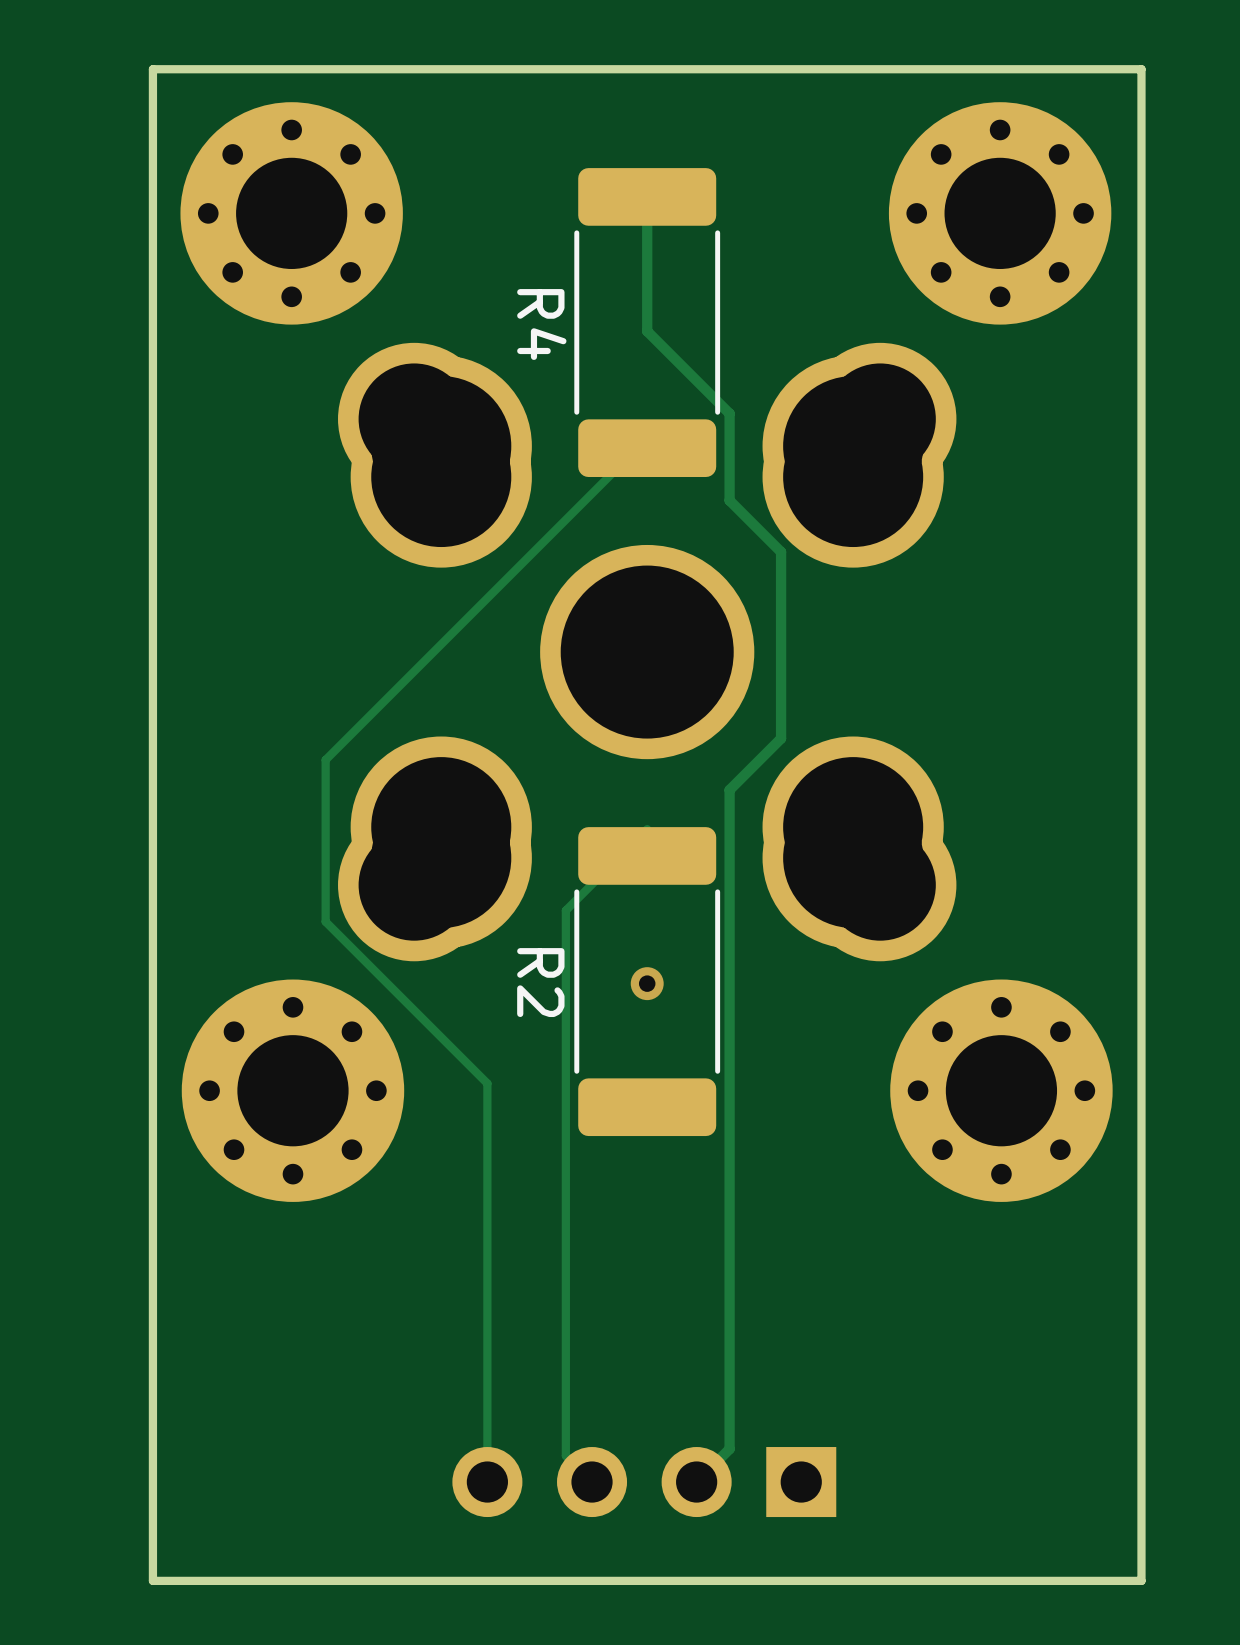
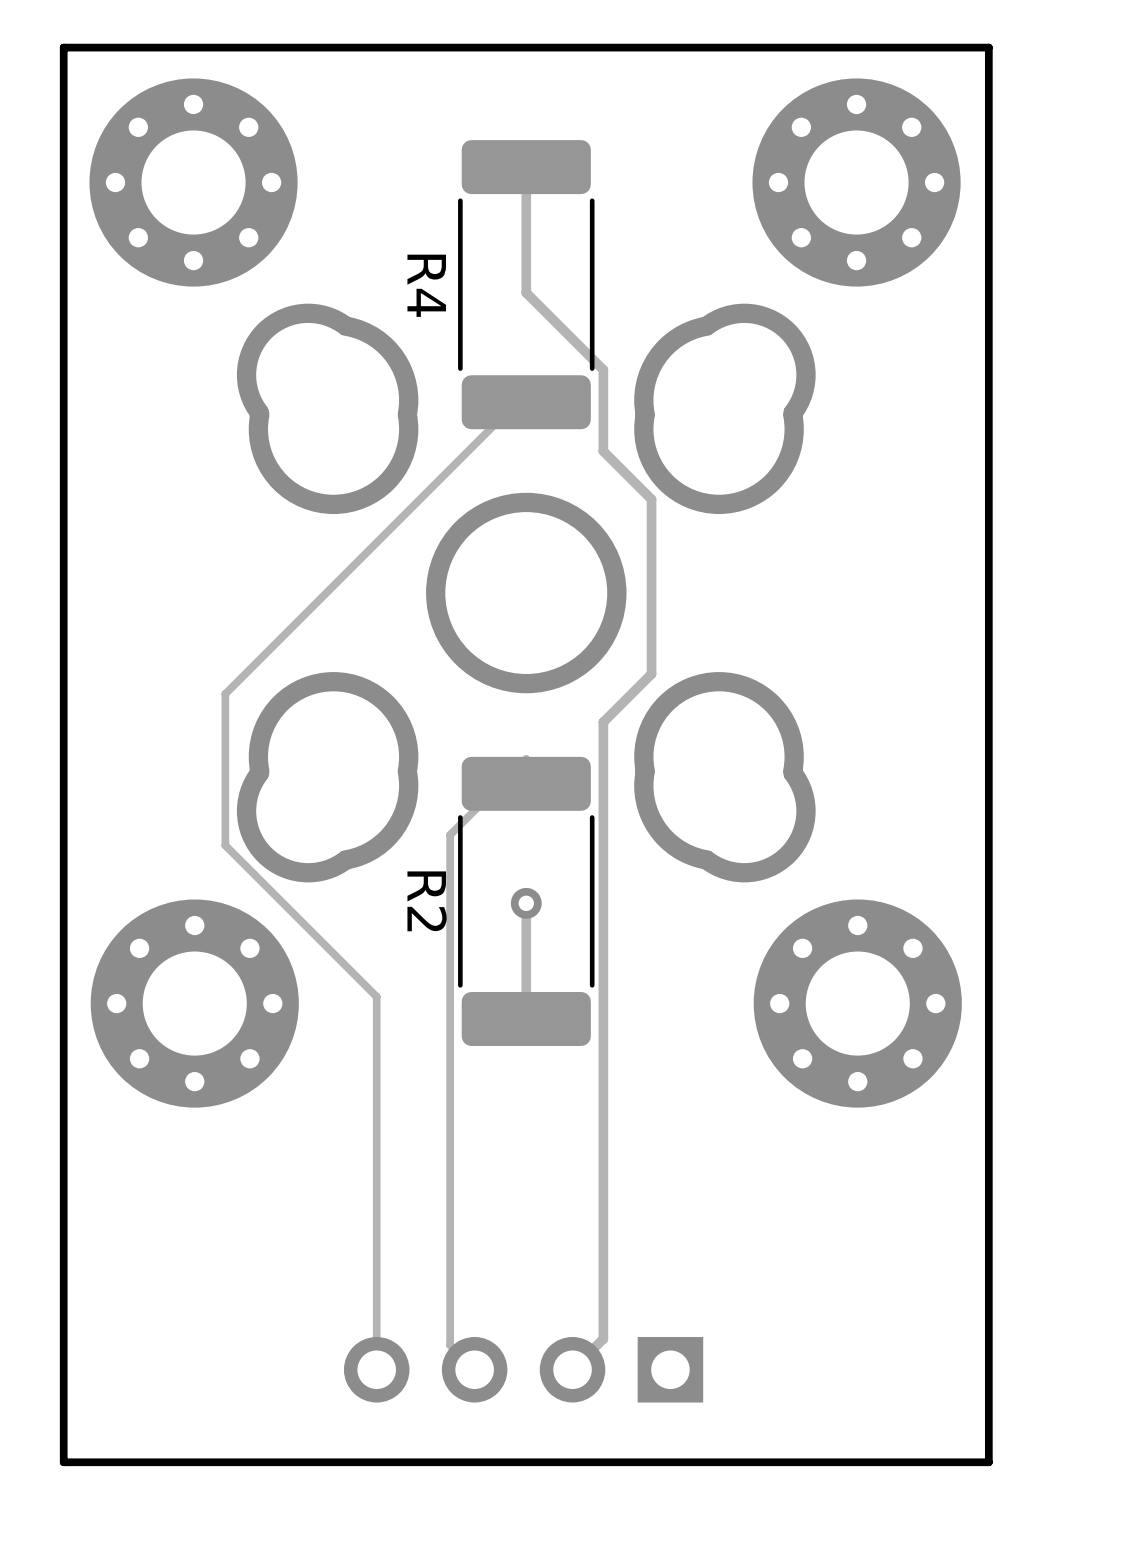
track: none -> (526, 903) (526, 1018)

